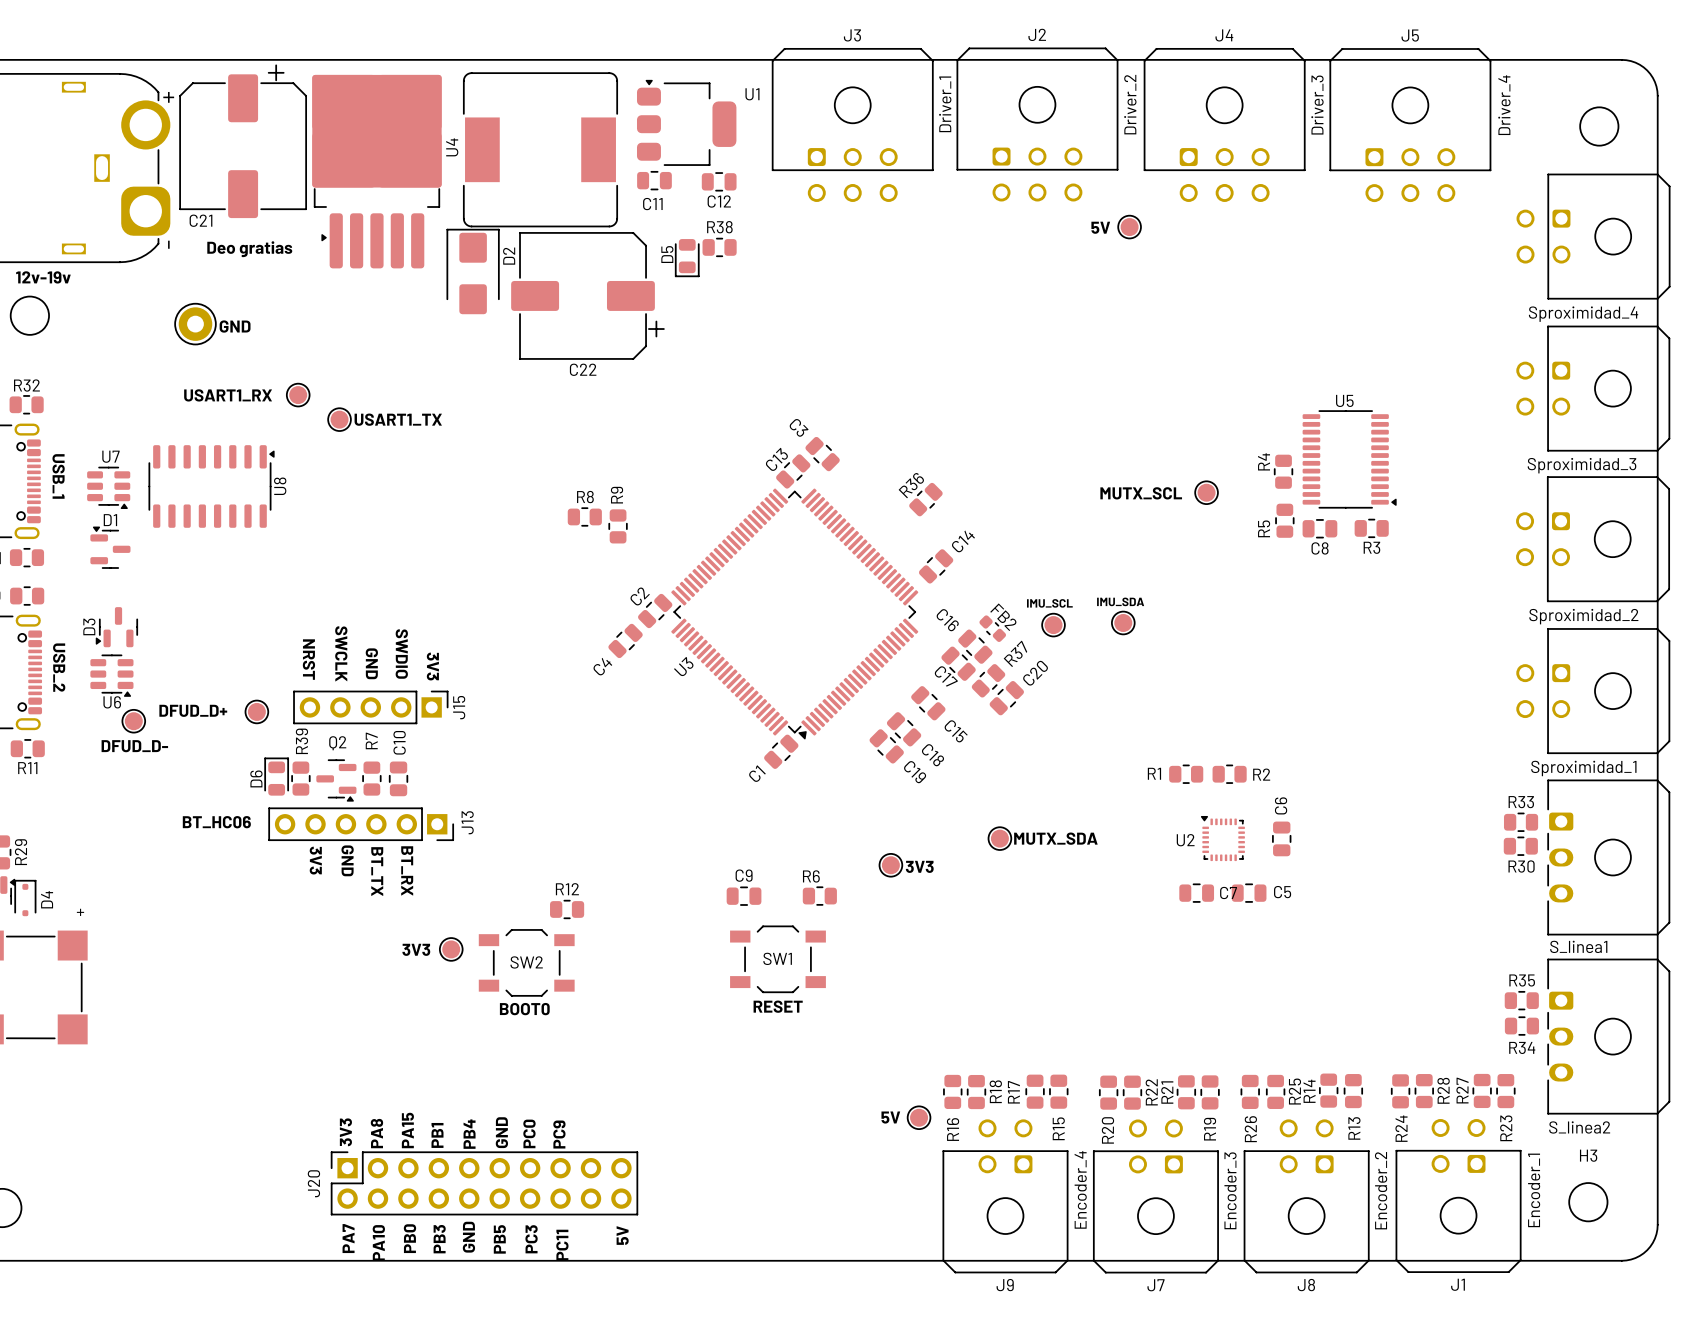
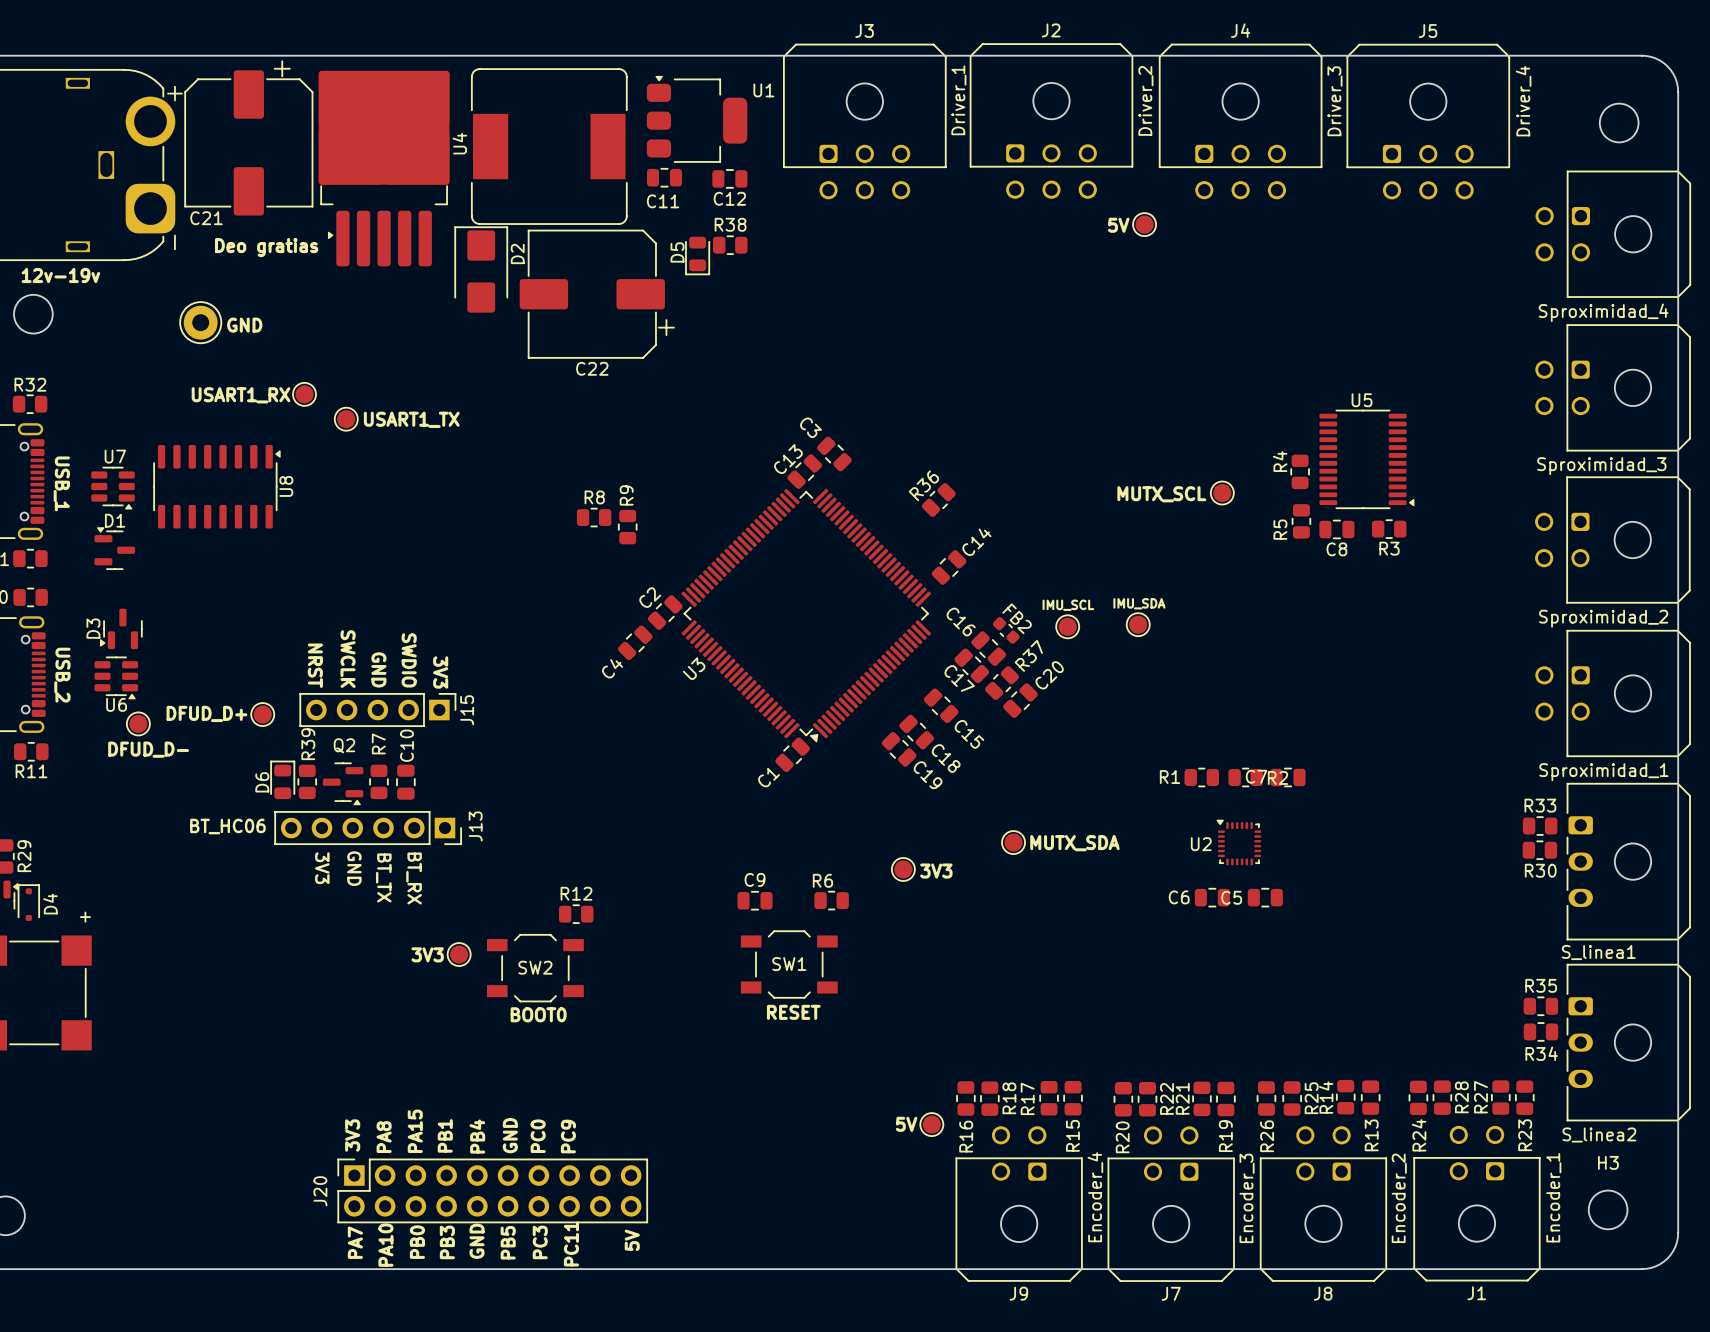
C7: none -> (1288, 777)
C6: (1281, 838) -> none
C7 name: C7 (1228, 892) -> C6 (1179, 897)
C5 name position: C5 (1282, 892) -> C5 (1231, 897)

